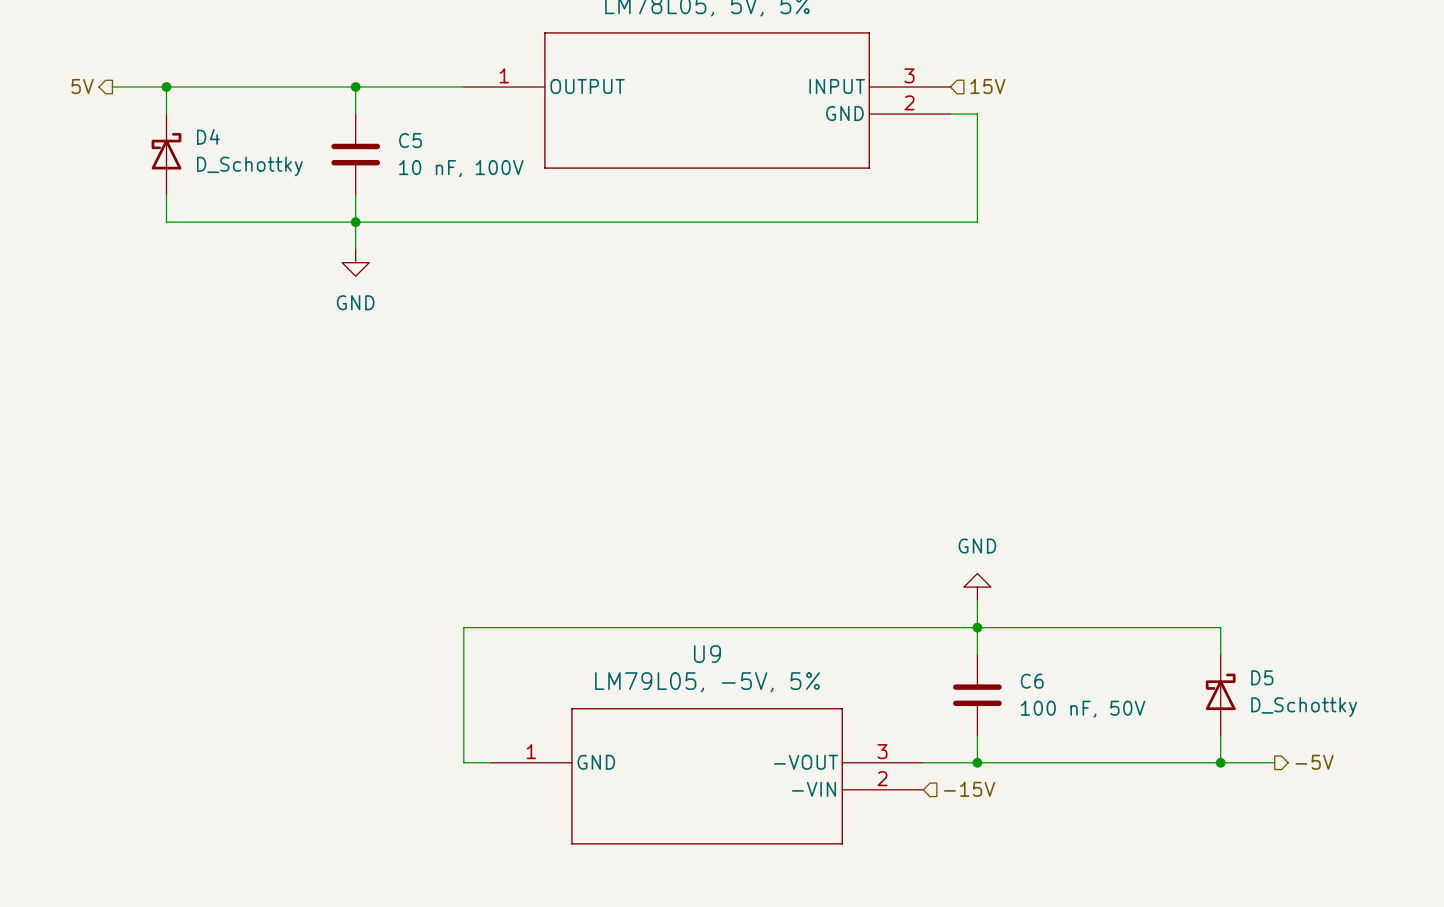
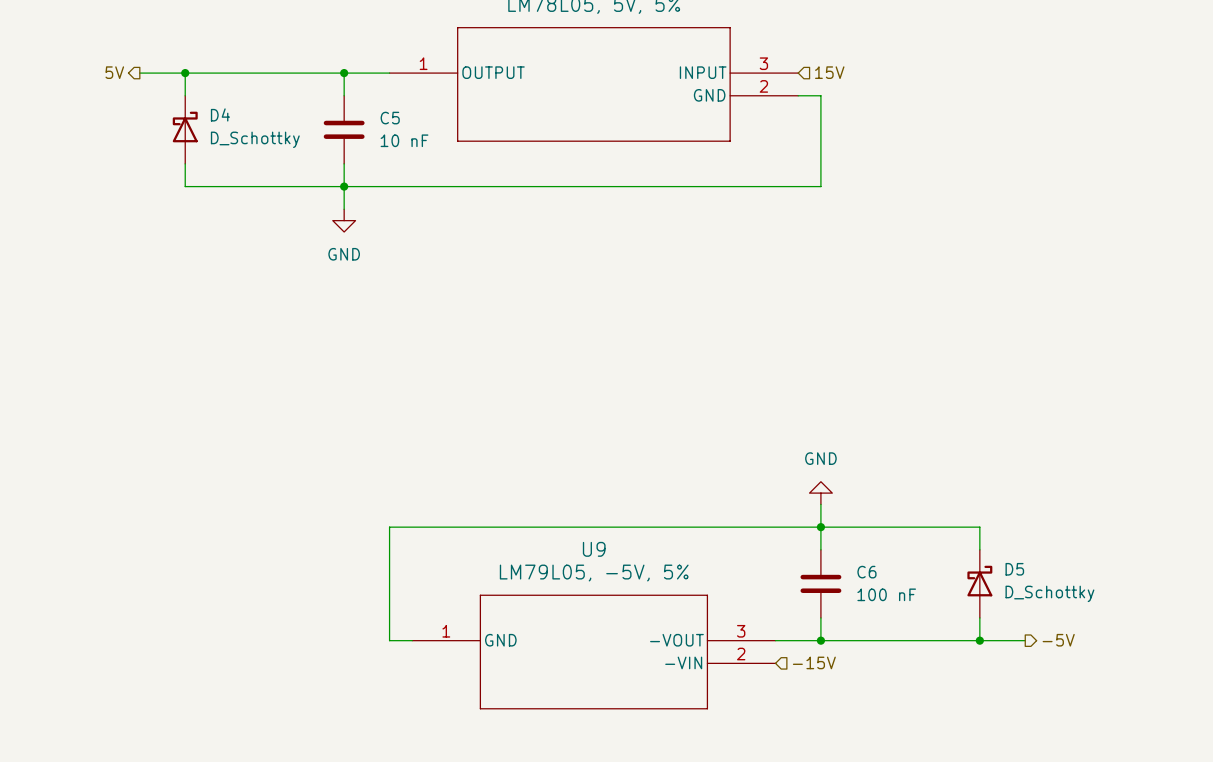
hierarchical label position: 5V (82, 86) -> 5V (114, 72)
wire: (112, 87) (166, 87) (166, 114) -> none
junction position: (166, 87) -> (185, 73)
wire: none -> (185, 73) (185, 95)
wire: (355, 87) (355, 114) -> (344, 73) (344, 95)
junction position: (355, 87) -> (344, 73)
D4 position: (166, 154) -> (185, 129)
C5 position: (355, 154) -> (344, 129)
C5 value: 10 nF, 100V (461, 168) -> 10 nF (404, 140)
wire: (166, 195) (166, 222) (220, 222) -> (185, 163) (185, 186)
wire: (355, 195) (355, 249) -> (344, 163) (344, 209)
junction position: (355, 222) -> (344, 186)
power symbol position: GND (355, 262) -> GND (344, 220)
wire: (1166, 627) (1220, 627) (1220, 654) -> (979, 527) (979, 549)
D5 position: (1220, 695) -> (979, 583)
C6 value: 100 nF, 50V (1083, 709) -> 100 nF (886, 594)
wire: none -> (979, 617) (979, 640)
wire: (1220, 735) (1220, 762) (1274, 762) -> none
junction position: (1220, 762) -> (979, 640)
hierarchical label position: -5V (1314, 762) -> -5V (1058, 640)

